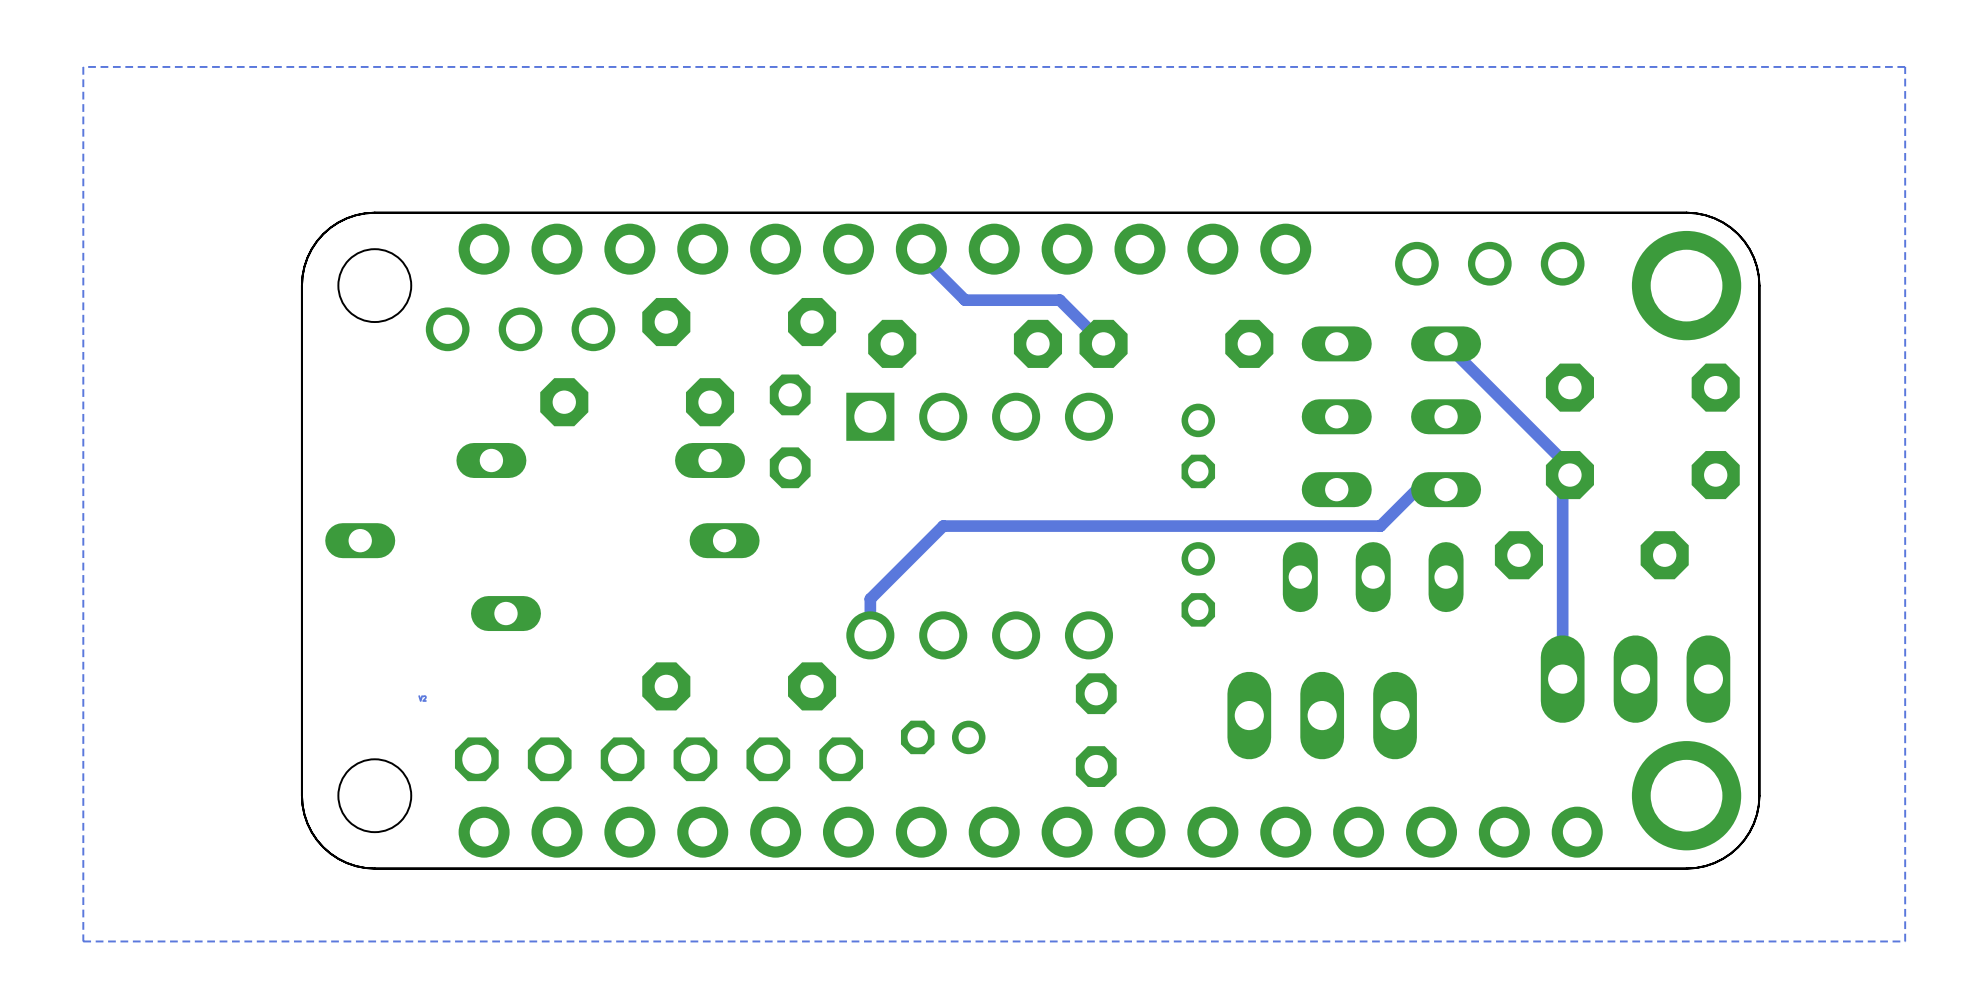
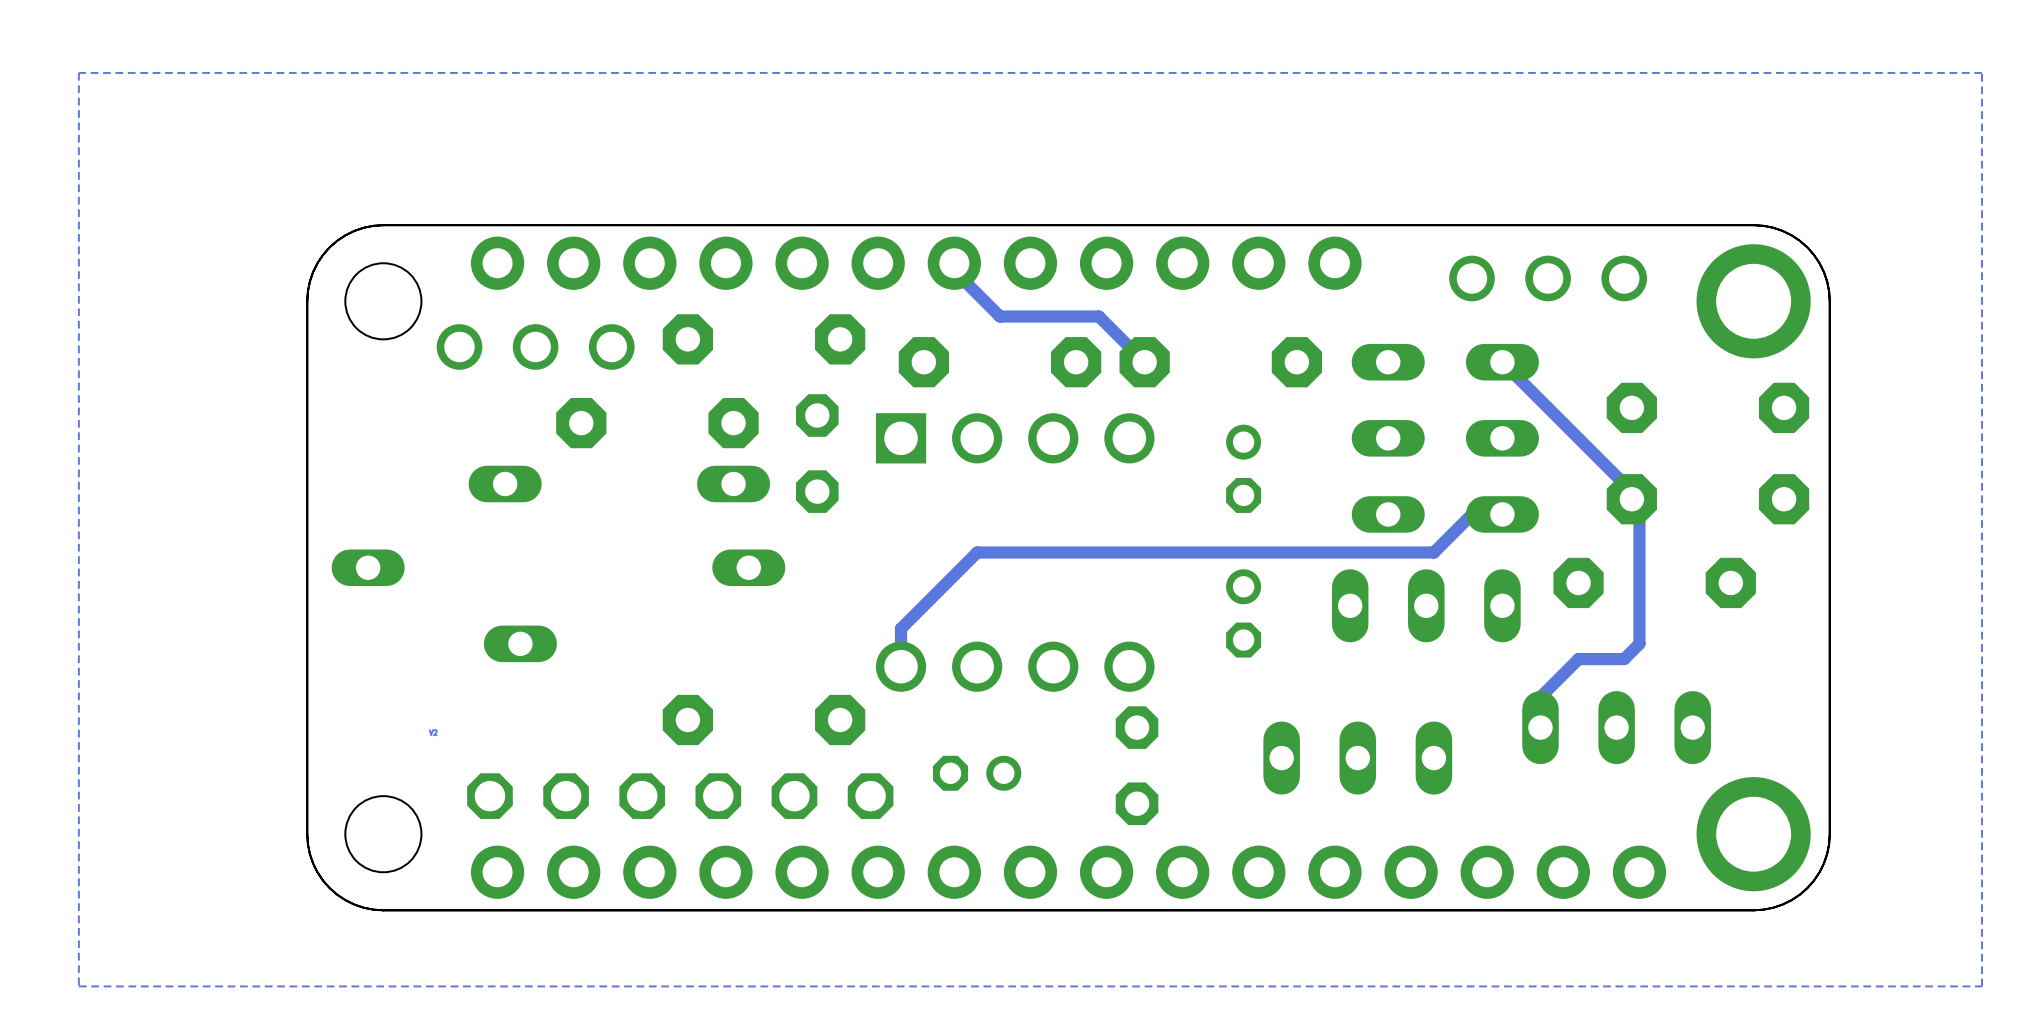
track: (1569, 475) (1562, 482) (1562, 679) -> (1631, 499) (1639, 506) (1639, 643) (1624, 659) (1578, 659) (1540, 697) (1540, 727)
part footprint: [1227, 671, 1417, 760] -> [1263, 721, 1453, 795]
part: (1635, 679) -> none
part: none -> (1616, 727)

